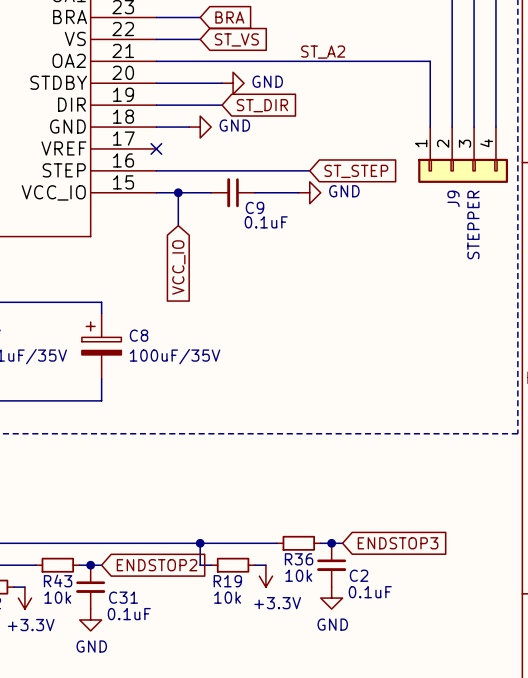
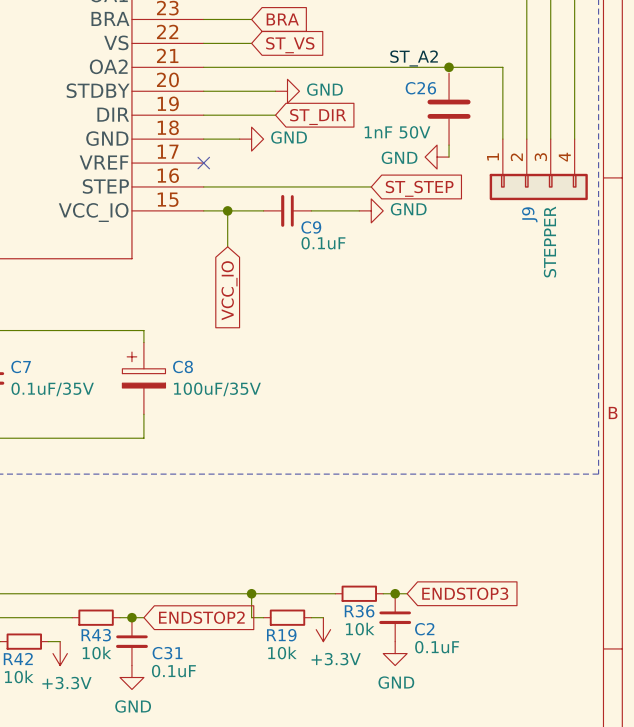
label position: ST_A2 (323, 52) -> ST_A2 (414, 58)
junction: none -> (449, 67)
C26: none -> 1nF 50V (449, 109)
wire: none -> (449, 145) (449, 157)
power symbol: none -> GND (437, 157)

